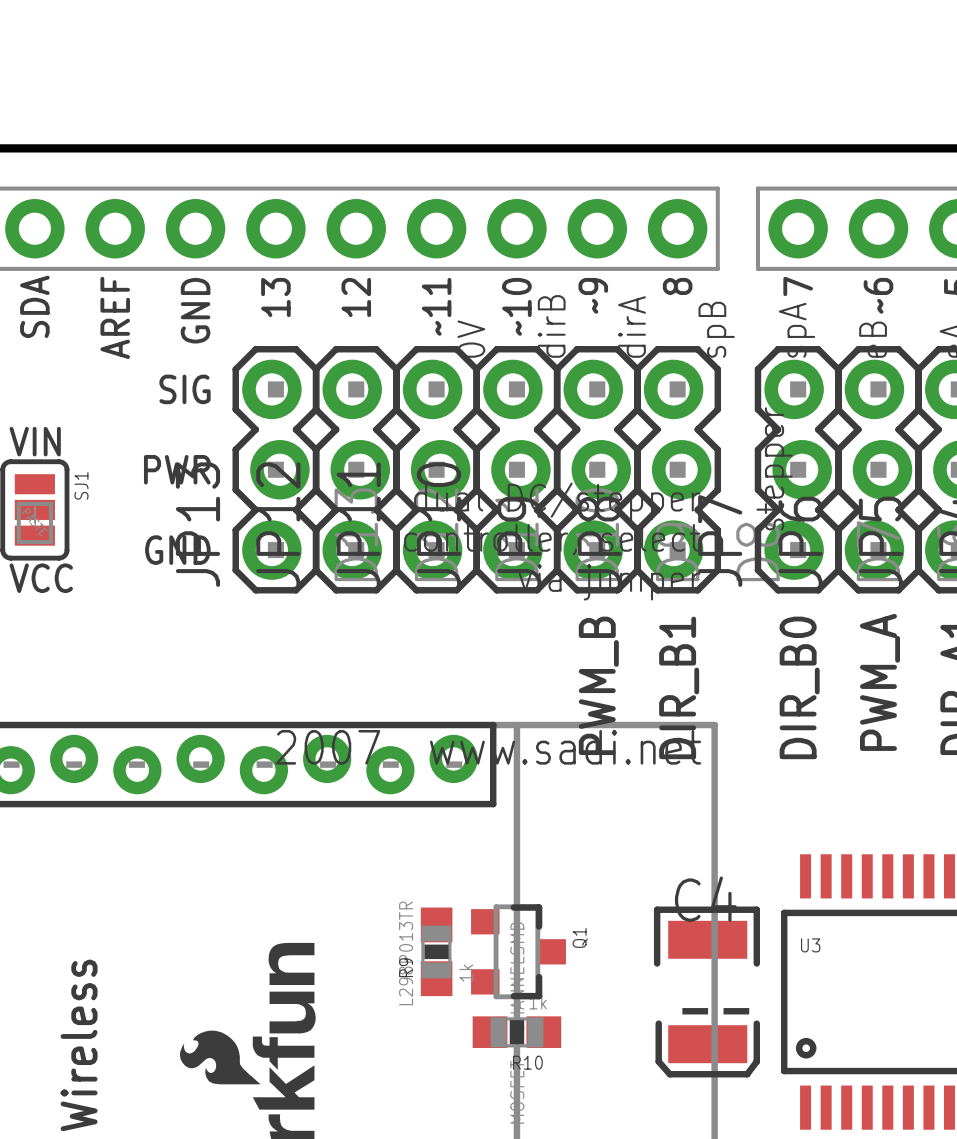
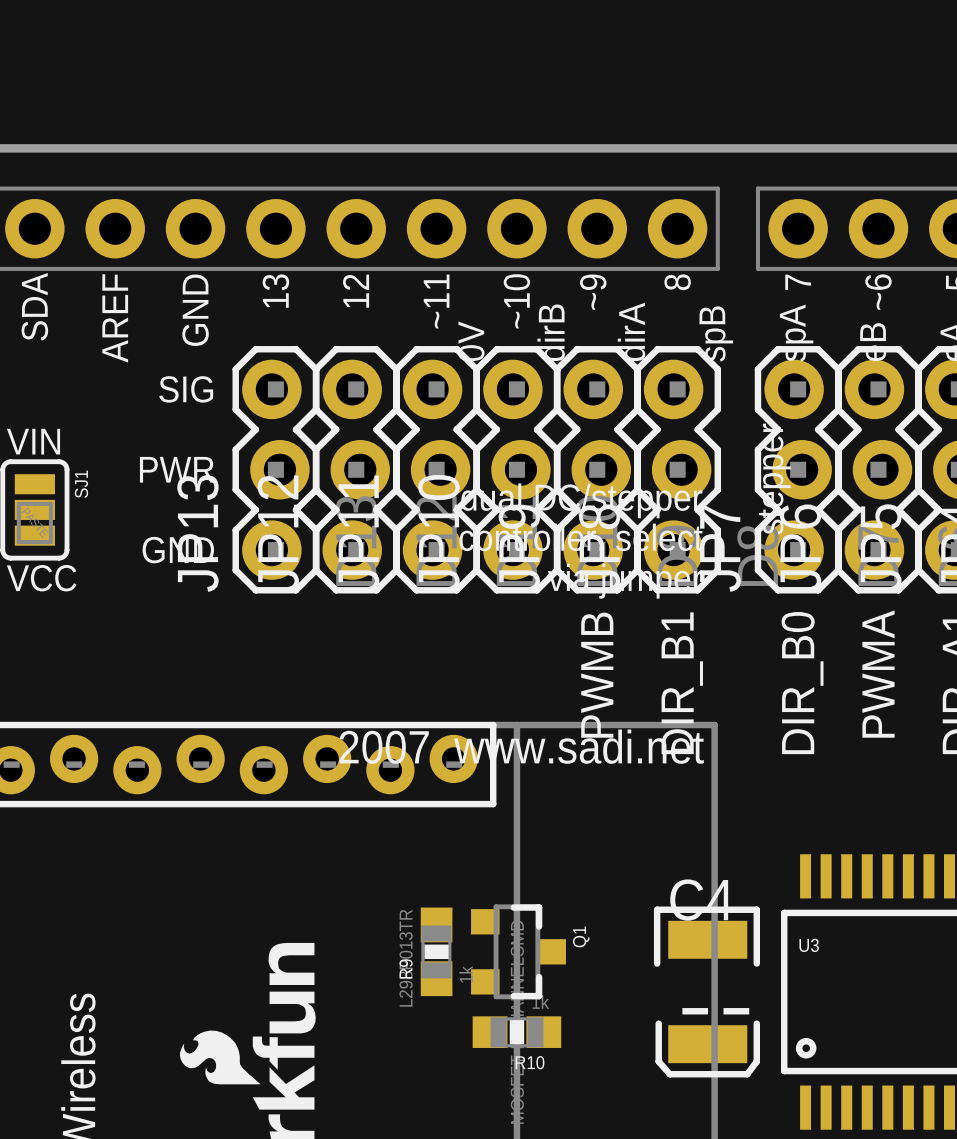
text: PWM_A (880, 682) -> PWMA (878, 674)
text: PWM_B (598, 685) -> PWMB (597, 675)

